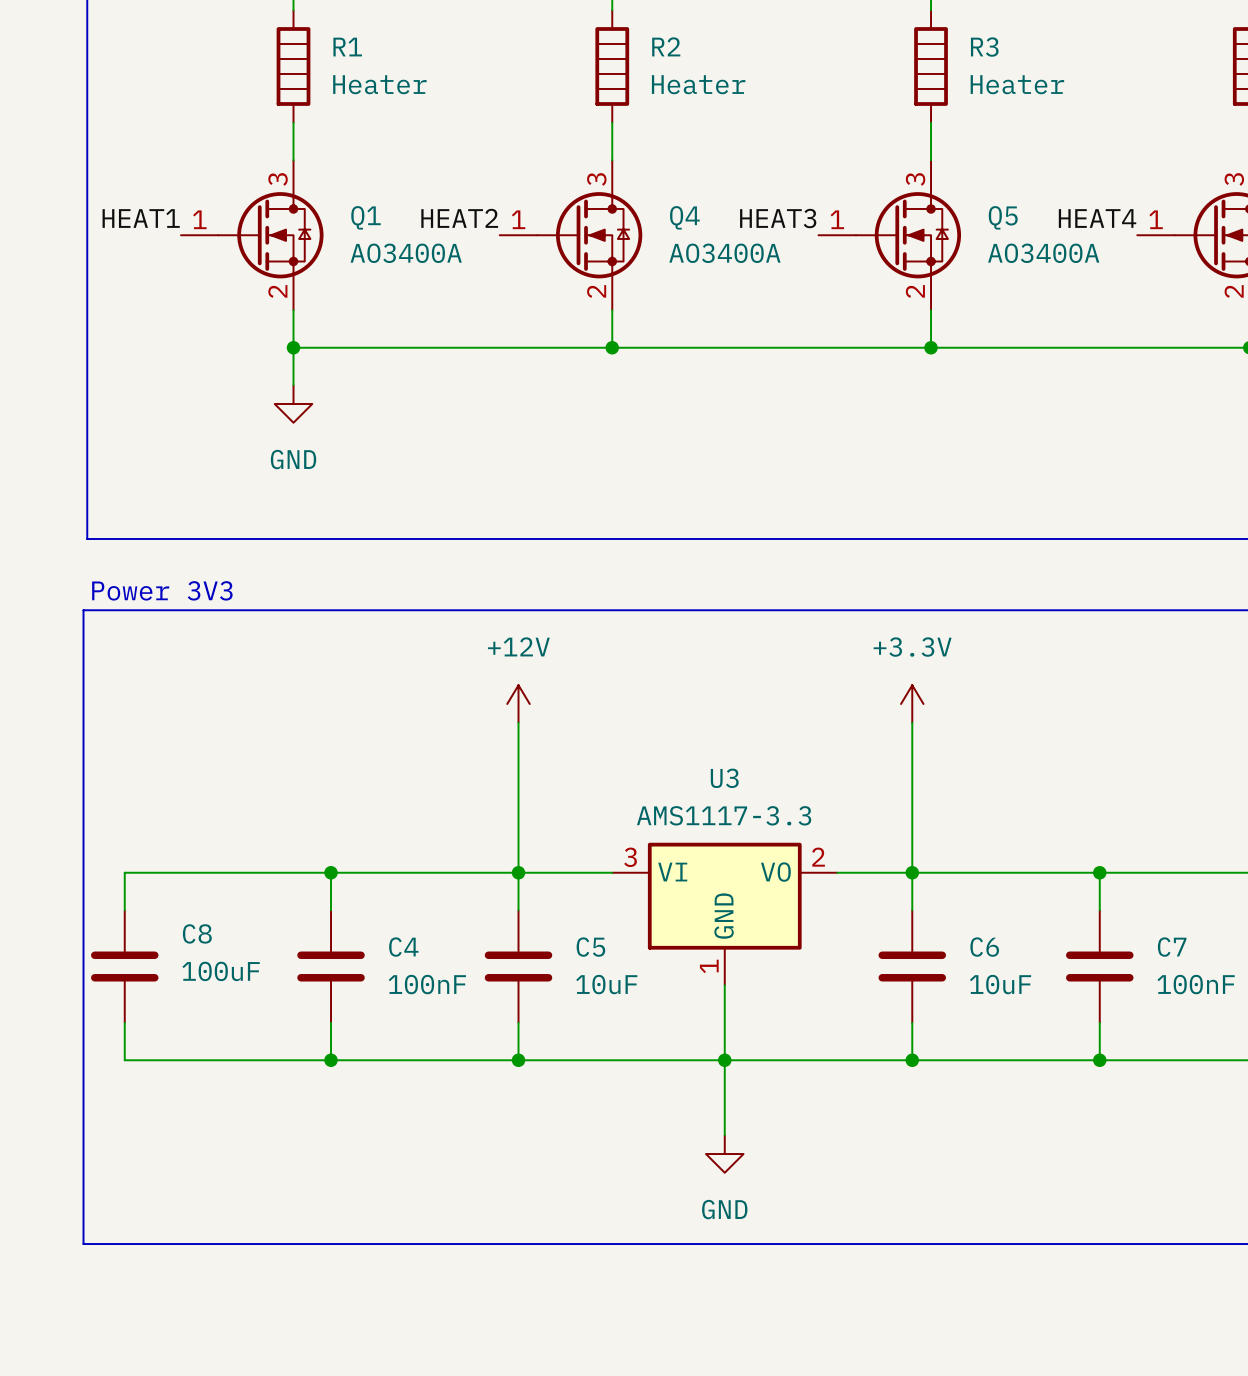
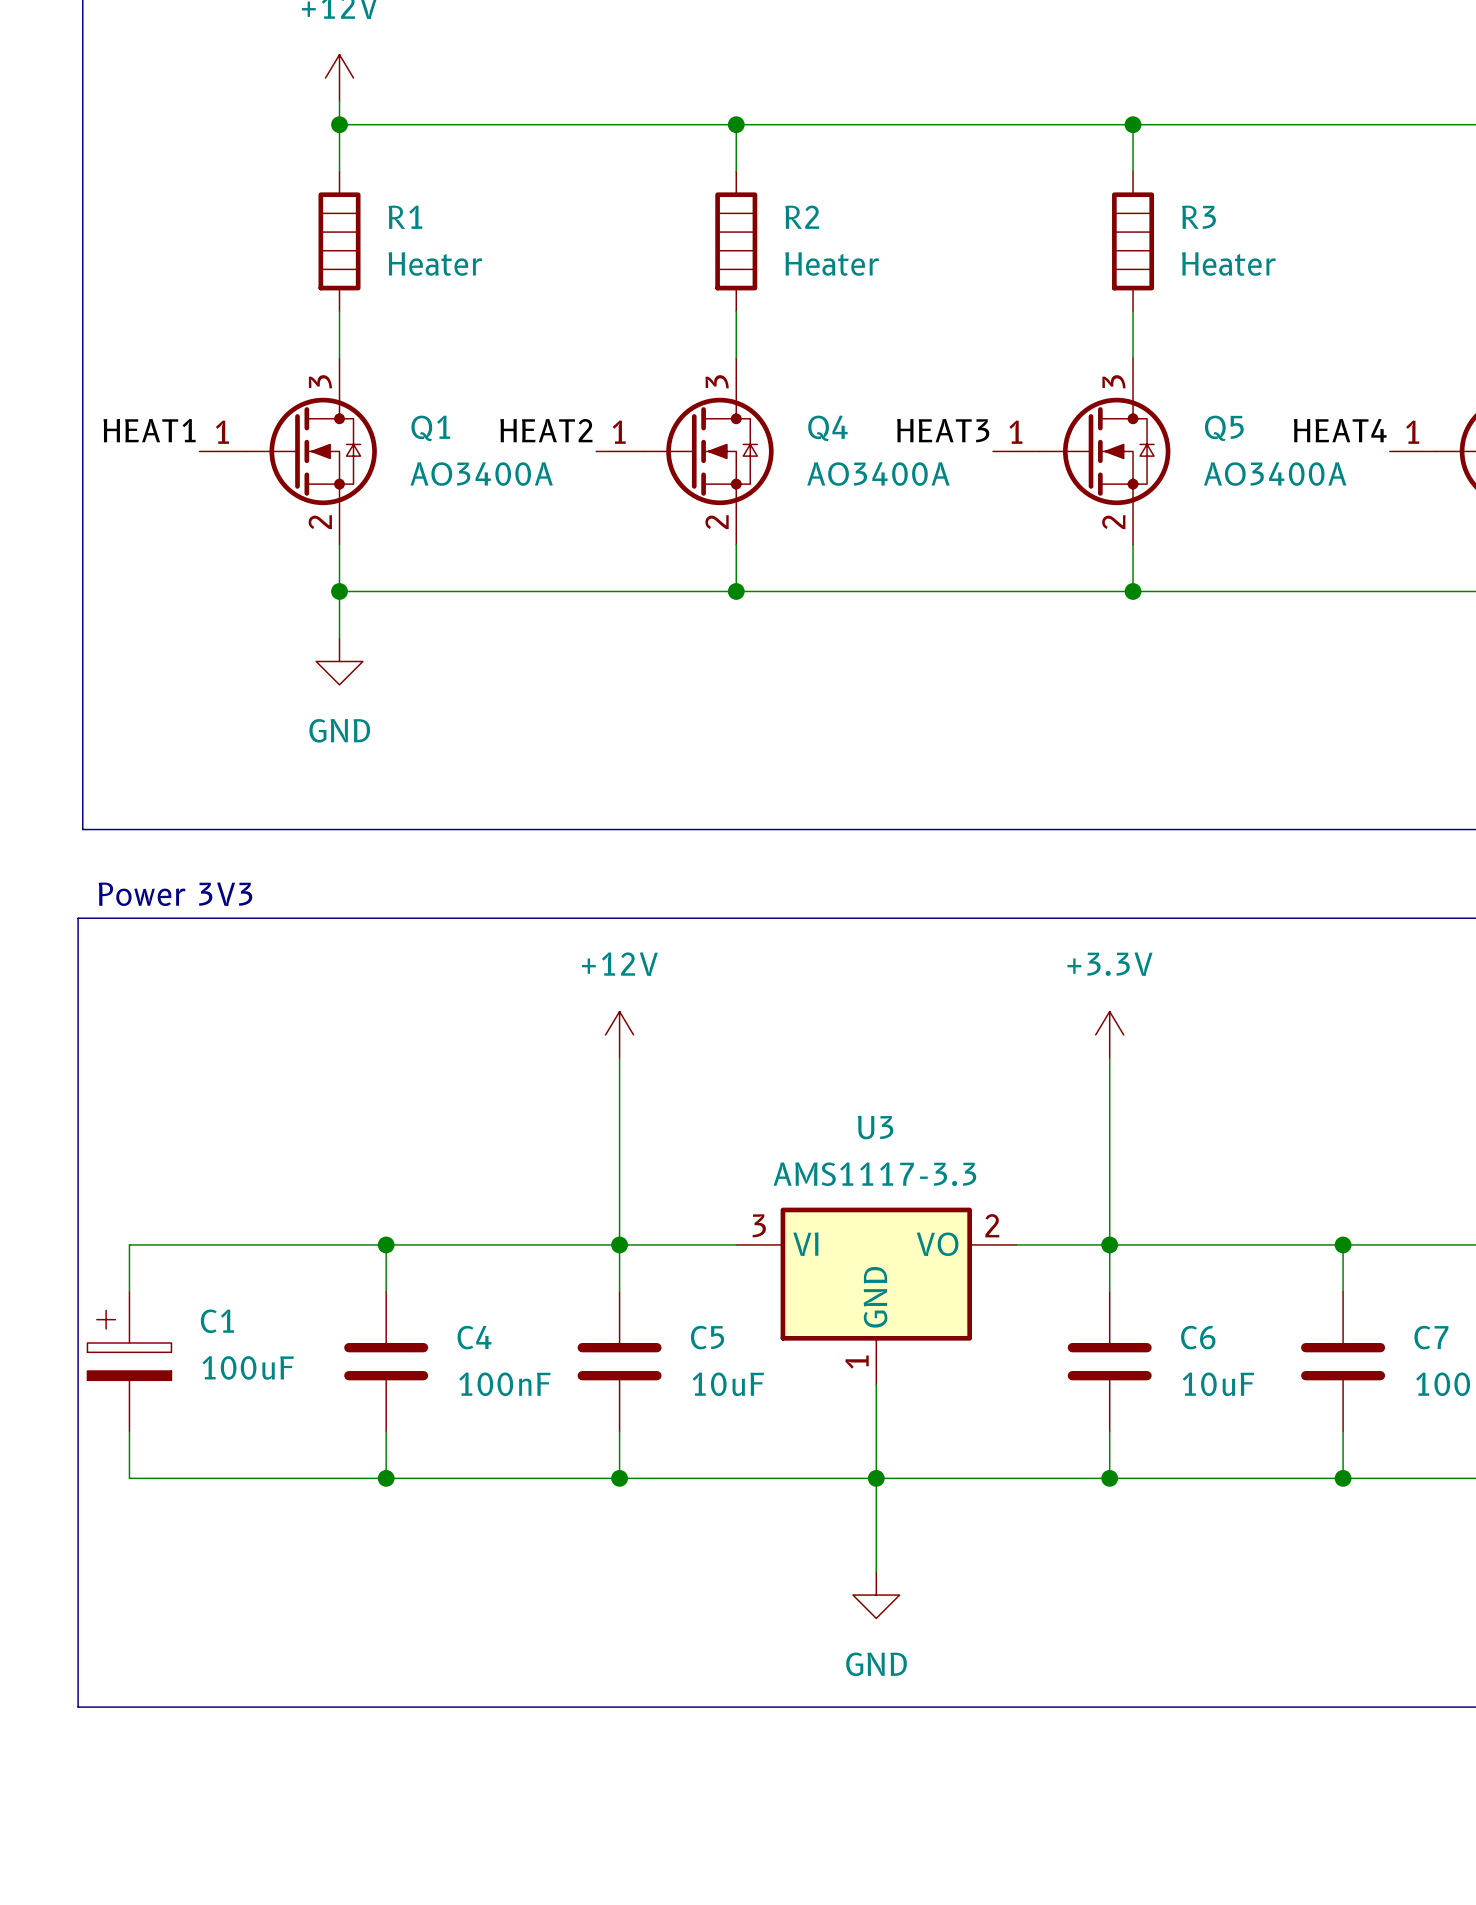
C8: 100uF (124, 966) -> none
C1: none -> 100uF (129, 1361)

